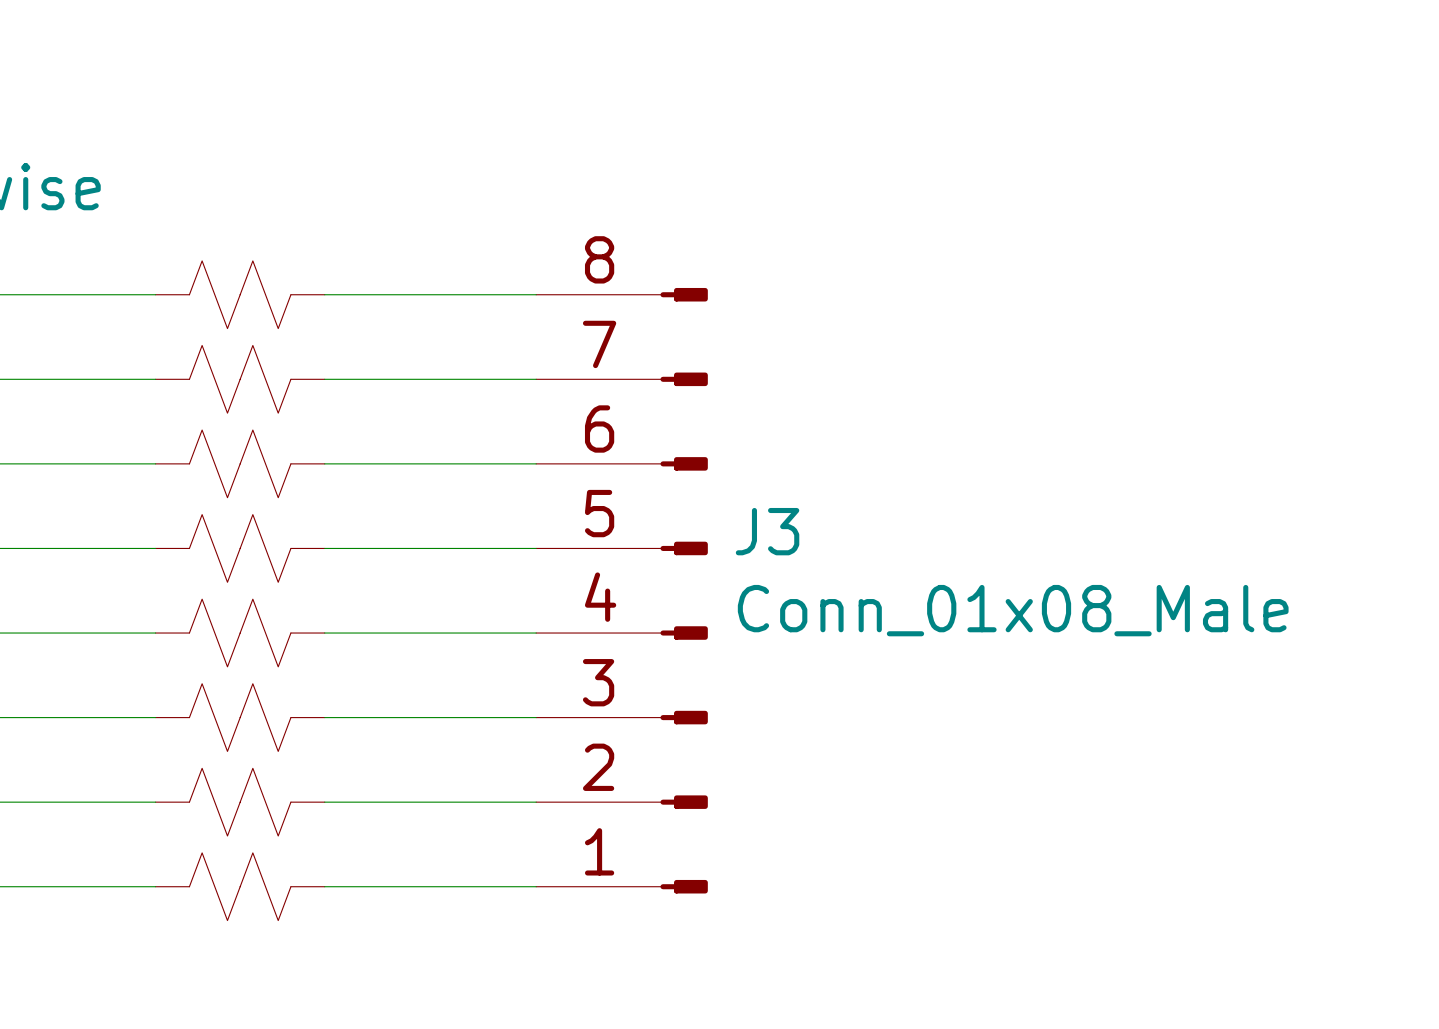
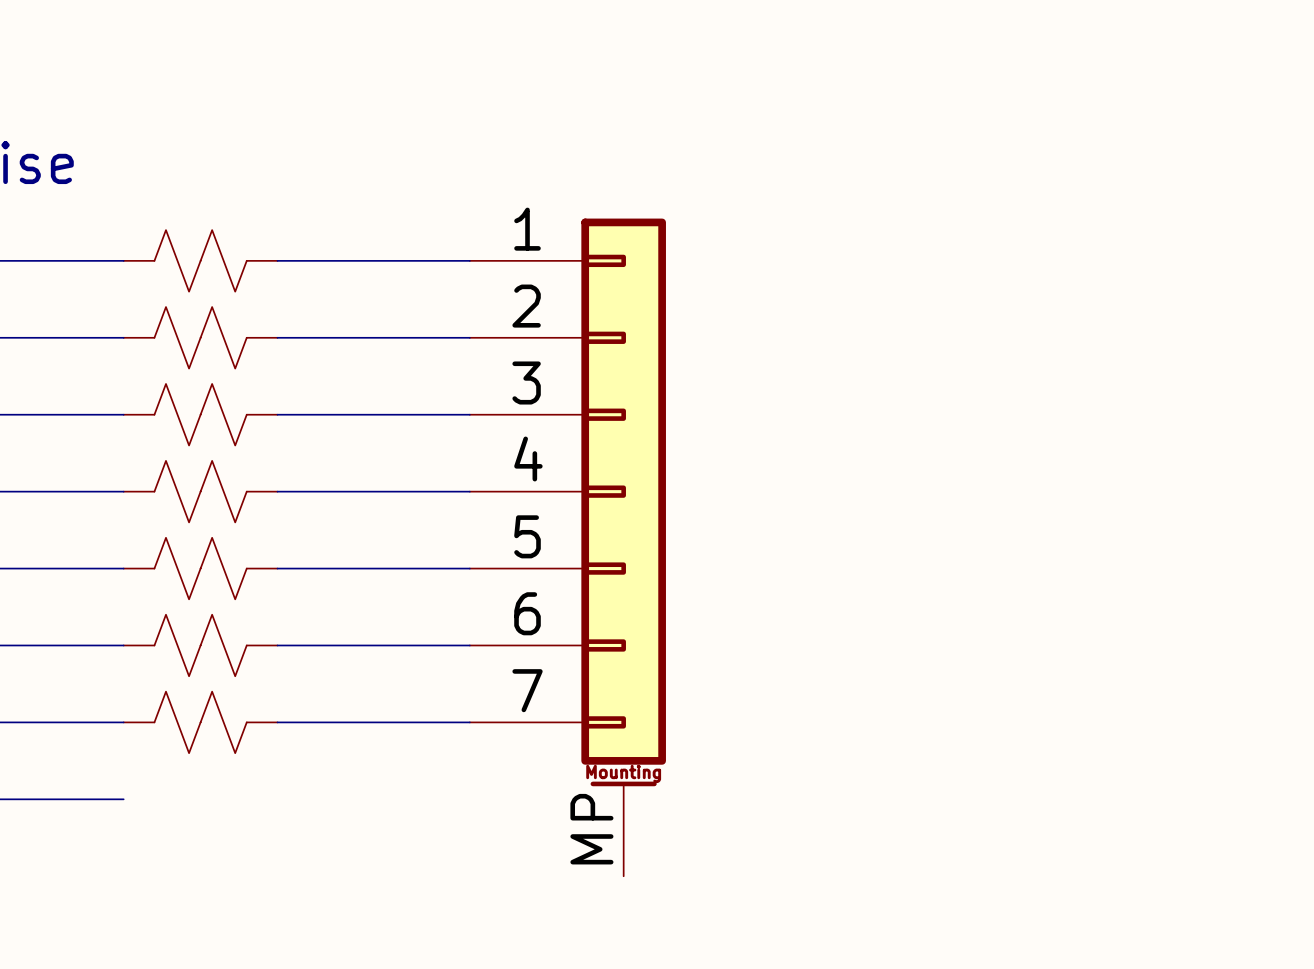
J3: Conn_01x08_Male (622, 590) -> none
part: none -> (567, 547)
part: (240, 886) -> none
wire: (324, 886) (536, 886) -> none

